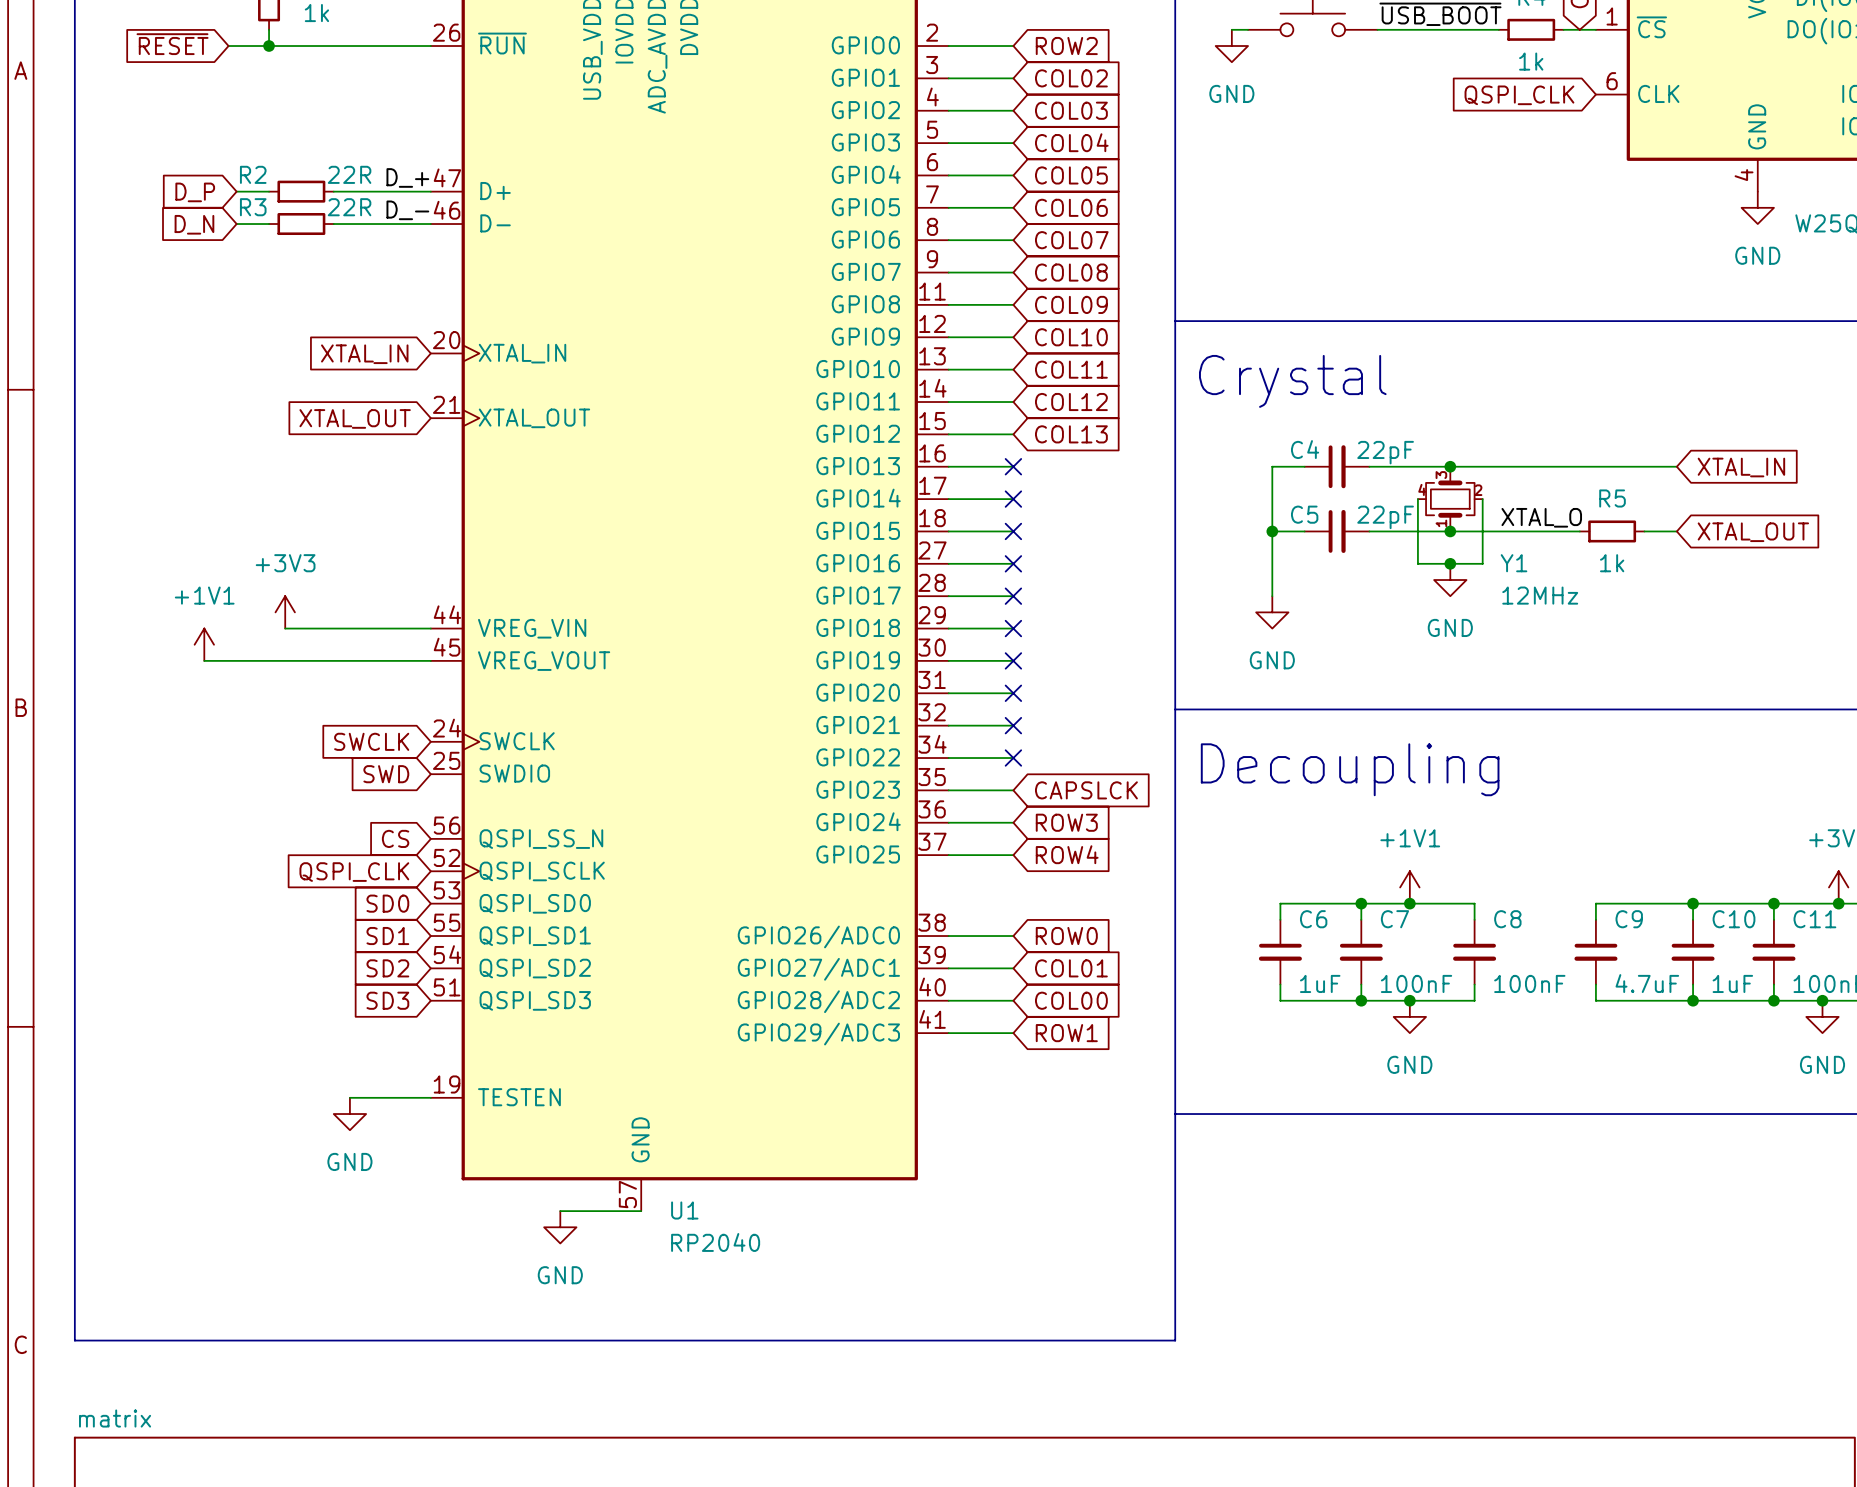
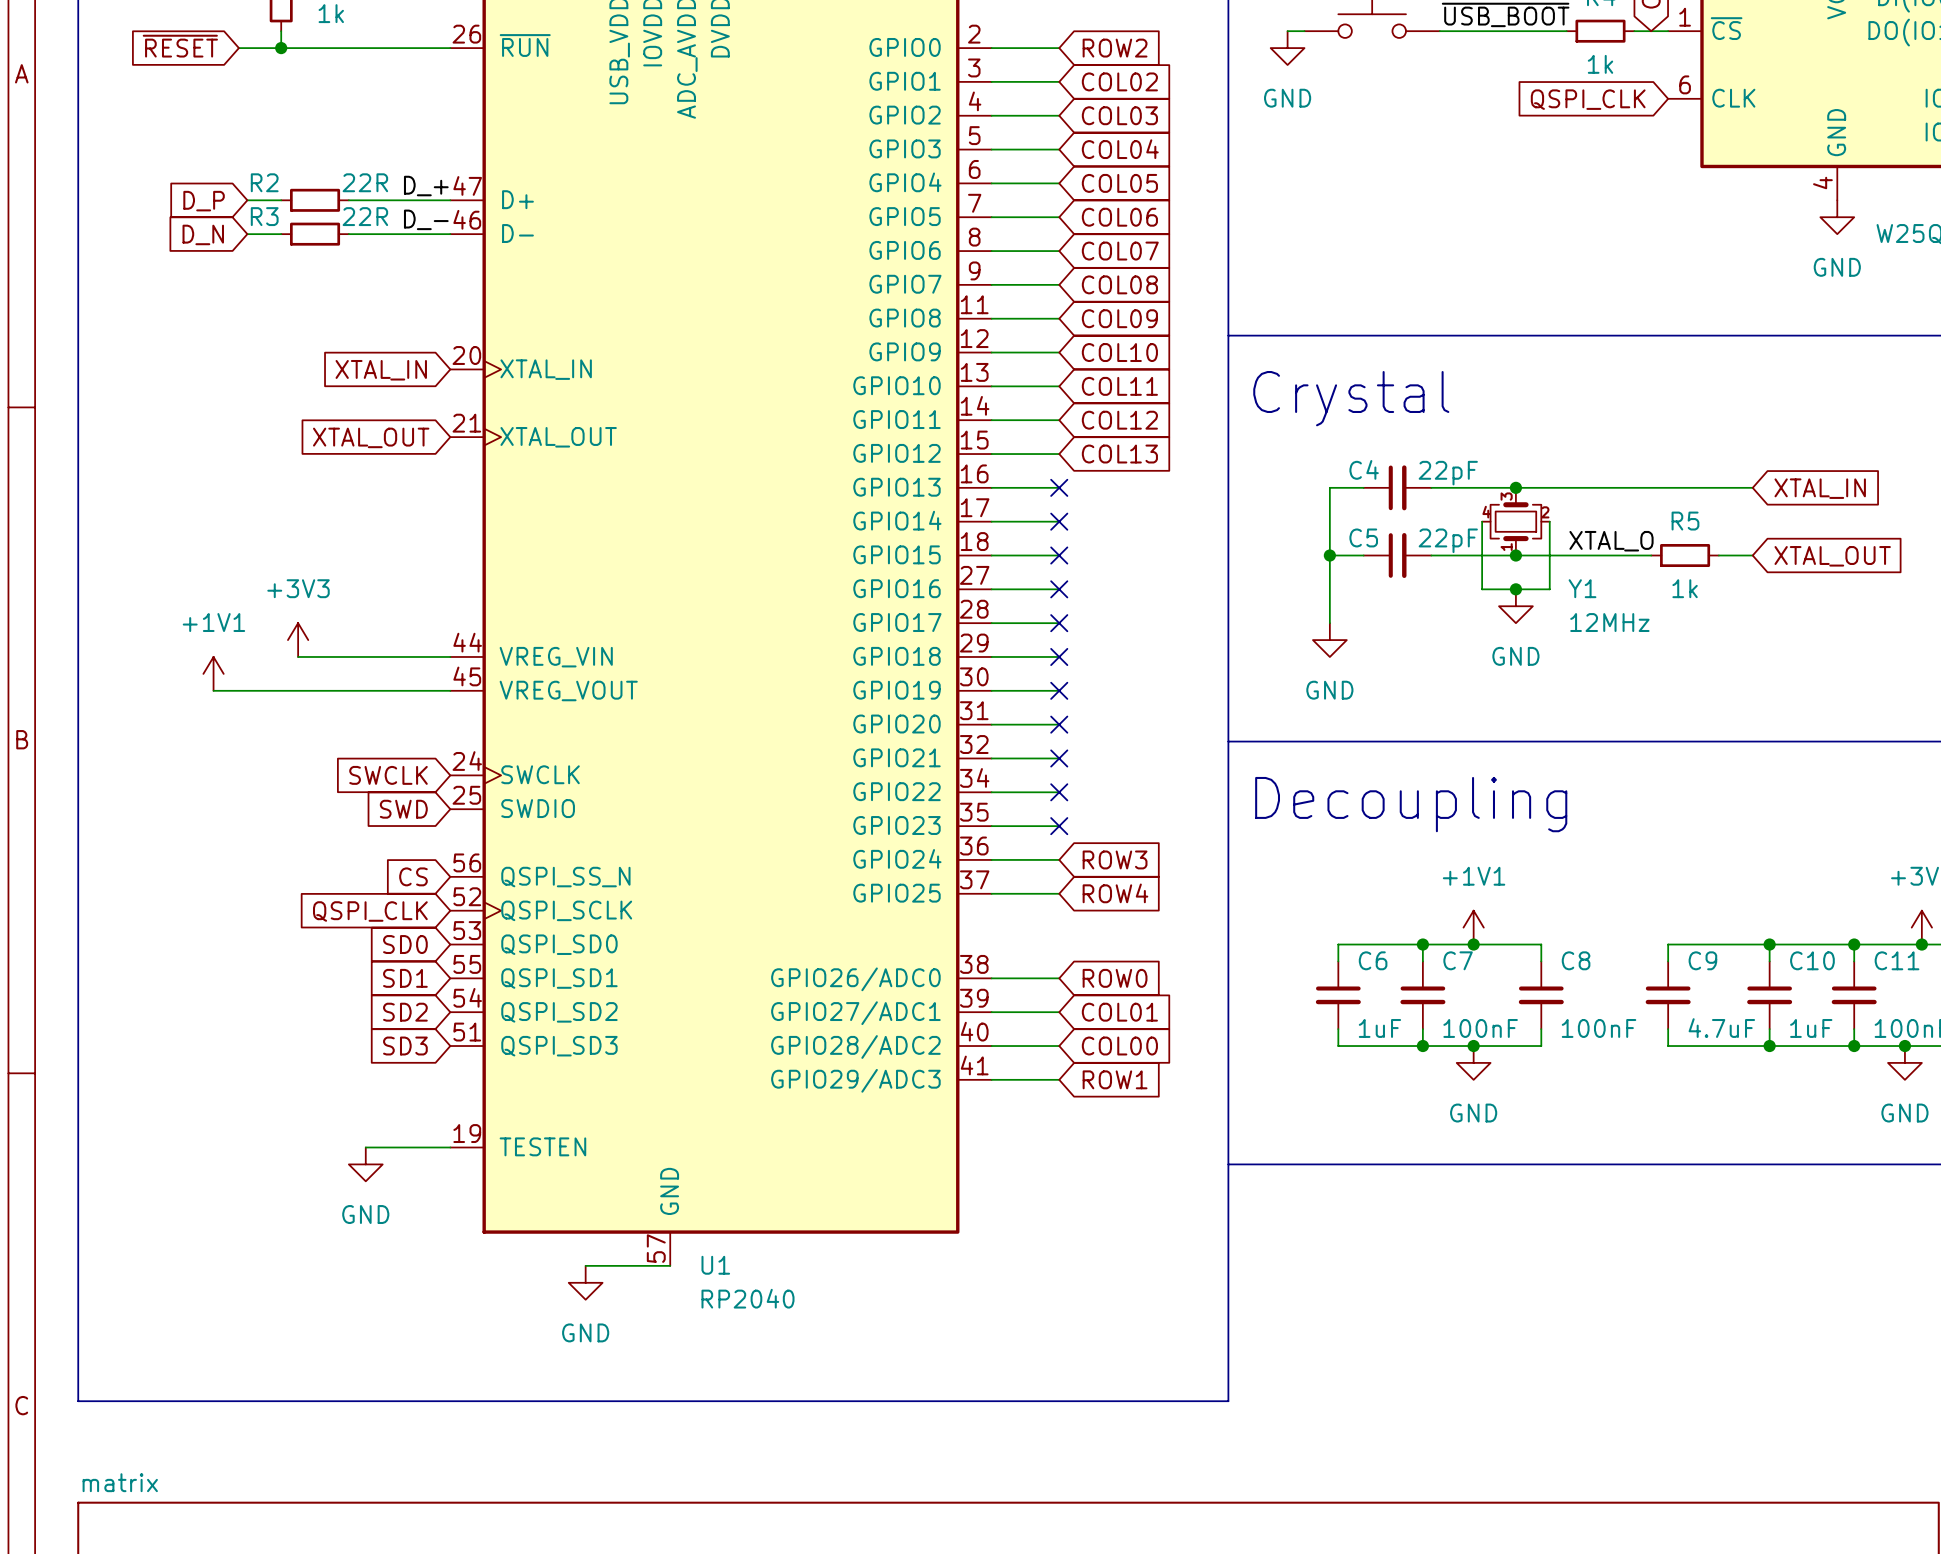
no-connect mark: none -> (1059, 826)
global label: CAPSLCK (1086, 790) -> none

